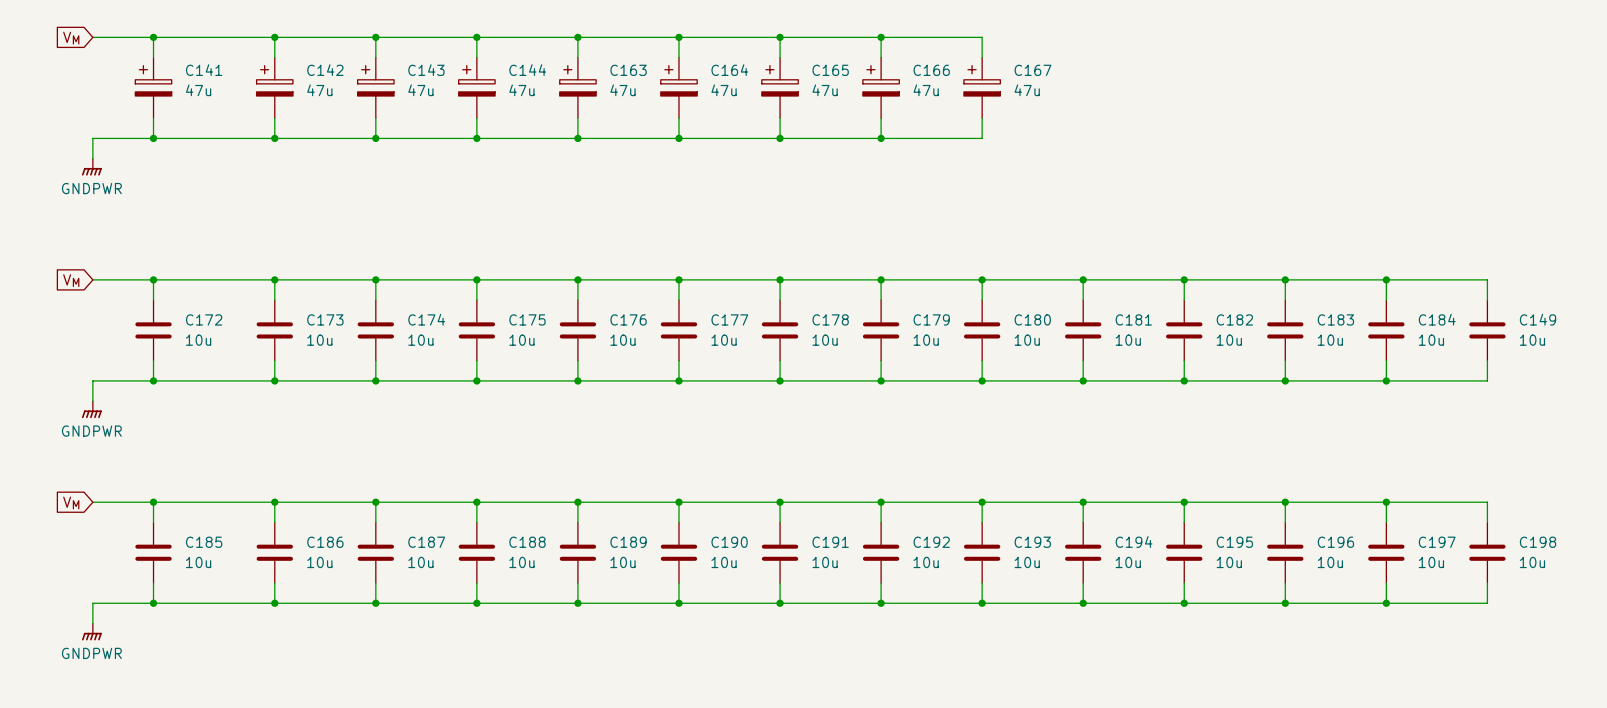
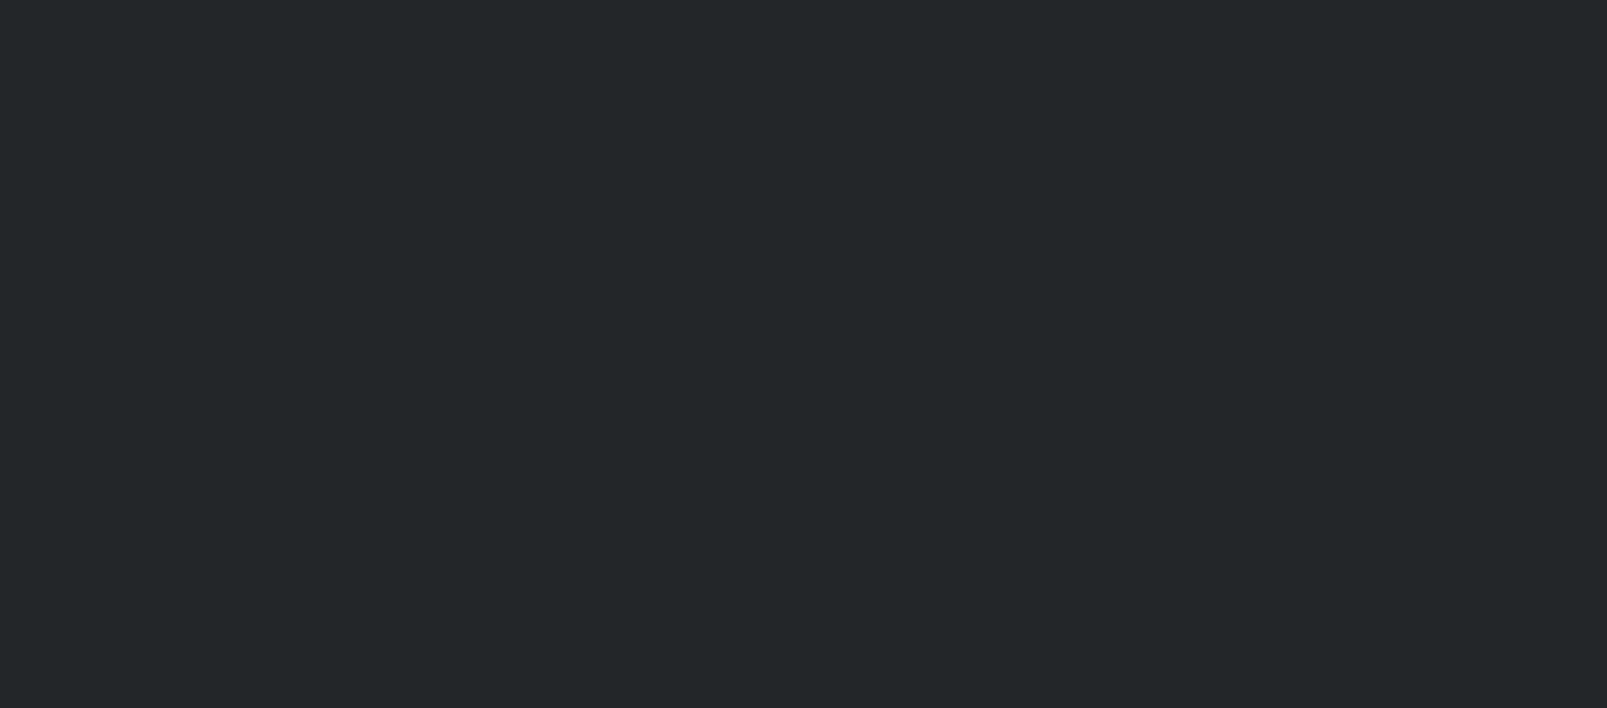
wire: (92, 37) (982, 37) (982, 57) -> none
wire: (153, 37) (153, 57) -> none
junction: (153, 37) -> none
wire: (274, 37) (274, 57) -> none
junction: (274, 37) -> none
wire: (375, 37) (375, 57) -> none
junction: (375, 37) -> none
wire: (476, 37) (476, 57) -> none
junction: (476, 37) -> none
wire: (577, 37) (577, 57) -> none
junction: (577, 37) -> none
wire: (678, 37) (678, 57) -> none
junction: (678, 37) -> none
wire: (780, 37) (780, 57) -> none
junction: (780, 37) -> none
wire: (881, 37) (881, 57) -> none
junction: (881, 37) -> none
global label: VM (71, 38) -> none
C141: 47u (153, 87) -> none
C142: 47u (274, 87) -> none
C143: 47u (375, 87) -> none
C144: 47u (476, 87) -> none
C163: 47u (577, 87) -> none
C164: 47u (678, 87) -> none
C165: 47u (780, 87) -> none
C166: 47u (881, 87) -> none
C167: 47u (982, 87) -> none
wire: (153, 118) (153, 138) -> none
wire: (274, 118) (274, 138) -> none
wire: (375, 118) (375, 138) -> none
wire: (476, 118) (476, 138) -> none
wire: (577, 118) (577, 138) -> none
wire: (678, 118) (678, 138) -> none
wire: (780, 118) (780, 138) -> none
wire: (881, 118) (881, 138) -> none
wire: (982, 118) (982, 138) (92, 138) (92, 158) -> none
junction: (153, 138) -> none
junction: (274, 138) -> none
junction: (375, 138) -> none
junction: (476, 138) -> none
junction: (577, 138) -> none
junction: (678, 138) -> none
junction: (780, 138) -> none
junction: (881, 138) -> none
power symbol: GNDPWR (91, 167) -> none
wire: (92, 279) (1487, 279) (1487, 300) -> none
wire: (153, 279) (153, 300) -> none
junction: (153, 279) -> none
wire: (274, 279) (274, 300) -> none
junction: (274, 279) -> none
wire: (375, 279) (375, 300) -> none
junction: (375, 279) -> none
wire: (476, 279) (476, 300) -> none
junction: (476, 279) -> none
wire: (577, 279) (577, 300) -> none
junction: (577, 279) -> none
wire: (678, 279) (678, 300) -> none
junction: (678, 279) -> none
wire: (780, 279) (780, 300) -> none
junction: (780, 279) -> none
wire: (881, 279) (881, 300) -> none
junction: (881, 279) -> none
wire: (982, 279) (982, 300) -> none
junction: (982, 279) -> none
wire: (1083, 279) (1083, 300) -> none
junction: (1083, 279) -> none
wire: (1184, 279) (1184, 300) -> none
junction: (1184, 279) -> none
wire: (1285, 279) (1285, 300) -> none
junction: (1285, 279) -> none
wire: (1386, 279) (1386, 300) -> none
junction: (1386, 279) -> none
global label: VM (71, 280) -> none
C172: 10u (153, 330) -> none
C173: 10u (274, 330) -> none
C174: 10u (375, 330) -> none
C175: 10u (476, 330) -> none
C176: 10u (577, 330) -> none
C177: 10u (678, 330) -> none
C178: 10u (780, 330) -> none
C179: 10u (881, 330) -> none
C180: 10u (982, 330) -> none
C181: 10u (1083, 330) -> none
C182: 10u (1184, 330) -> none
C183: 10u (1285, 330) -> none
C184: 10u (1386, 330) -> none
C149: 10u (1487, 330) -> none
wire: (153, 360) (153, 380) -> none
wire: (274, 360) (274, 380) -> none
wire: (375, 360) (375, 380) -> none
wire: (476, 360) (476, 380) -> none
wire: (577, 360) (577, 380) -> none
wire: (678, 360) (678, 380) -> none
wire: (780, 360) (780, 380) -> none
wire: (881, 360) (881, 380) -> none
wire: (982, 360) (982, 380) -> none
wire: (1083, 360) (1083, 380) -> none
wire: (1184, 360) (1184, 380) -> none
wire: (1285, 360) (1285, 380) -> none
wire: (1386, 360) (1386, 380) -> none
wire: (1487, 360) (1487, 380) (92, 380) (92, 401) -> none
junction: (153, 380) -> none
junction: (274, 380) -> none
junction: (375, 380) -> none
junction: (476, 380) -> none
junction: (577, 380) -> none
junction: (678, 380) -> none
junction: (780, 380) -> none
junction: (881, 380) -> none
junction: (982, 380) -> none
junction: (1083, 380) -> none
junction: (1184, 380) -> none
junction: (1285, 380) -> none
junction: (1386, 380) -> none
power symbol: GNDPWR (91, 409) -> none
global label: VM (71, 502) -> none
wire: (92, 502) (1487, 502) (1487, 522) -> none
wire: (153, 502) (153, 522) -> none
junction: (153, 502) -> none
wire: (274, 502) (274, 522) -> none
junction: (274, 502) -> none
wire: (375, 502) (375, 522) -> none
junction: (375, 502) -> none
wire: (476, 502) (476, 522) -> none
junction: (476, 502) -> none
wire: (577, 502) (577, 522) -> none
junction: (577, 502) -> none
wire: (678, 502) (678, 522) -> none
junction: (678, 502) -> none
wire: (780, 502) (780, 522) -> none
junction: (780, 502) -> none
wire: (881, 502) (881, 522) -> none
junction: (881, 502) -> none
wire: (982, 502) (982, 522) -> none
junction: (982, 502) -> none
wire: (1083, 502) (1083, 522) -> none
junction: (1083, 502) -> none
wire: (1184, 502) (1184, 522) -> none
junction: (1184, 502) -> none
wire: (1285, 502) (1285, 522) -> none
junction: (1285, 502) -> none
wire: (1386, 502) (1386, 522) -> none
junction: (1386, 502) -> none
C185: 10u (153, 552) -> none
C186: 10u (274, 552) -> none
C187: 10u (375, 552) -> none
C188: 10u (476, 552) -> none
C189: 10u (577, 552) -> none
C190: 10u (678, 552) -> none
C191: 10u (780, 552) -> none
C192: 10u (881, 552) -> none
C193: 10u (982, 552) -> none
C194: 10u (1083, 552) -> none
C195: 10u (1184, 552) -> none
C196: 10u (1285, 552) -> none
C197: 10u (1386, 552) -> none
C198: 10u (1487, 552) -> none
wire: (153, 583) (153, 603) -> none
wire: (274, 583) (274, 603) -> none
wire: (375, 583) (375, 603) -> none
wire: (476, 583) (476, 603) -> none
wire: (577, 583) (577, 603) -> none
wire: (678, 583) (678, 603) -> none
wire: (780, 583) (780, 603) -> none
wire: (881, 583) (881, 603) -> none
wire: (982, 583) (982, 603) -> none
wire: (1083, 583) (1083, 603) -> none
wire: (1184, 583) (1184, 603) -> none
wire: (1285, 583) (1285, 603) -> none
wire: (1386, 583) (1386, 603) -> none
wire: (1487, 583) (1487, 603) (92, 603) (92, 623) -> none
junction: (153, 603) -> none
junction: (274, 603) -> none
junction: (375, 603) -> none
junction: (476, 603) -> none
junction: (577, 603) -> none
junction: (678, 603) -> none
junction: (780, 603) -> none
junction: (881, 603) -> none
junction: (982, 603) -> none
junction: (1083, 603) -> none
junction: (1184, 603) -> none
junction: (1285, 603) -> none
junction: (1386, 603) -> none
power symbol: GNDPWR (91, 631) -> none

